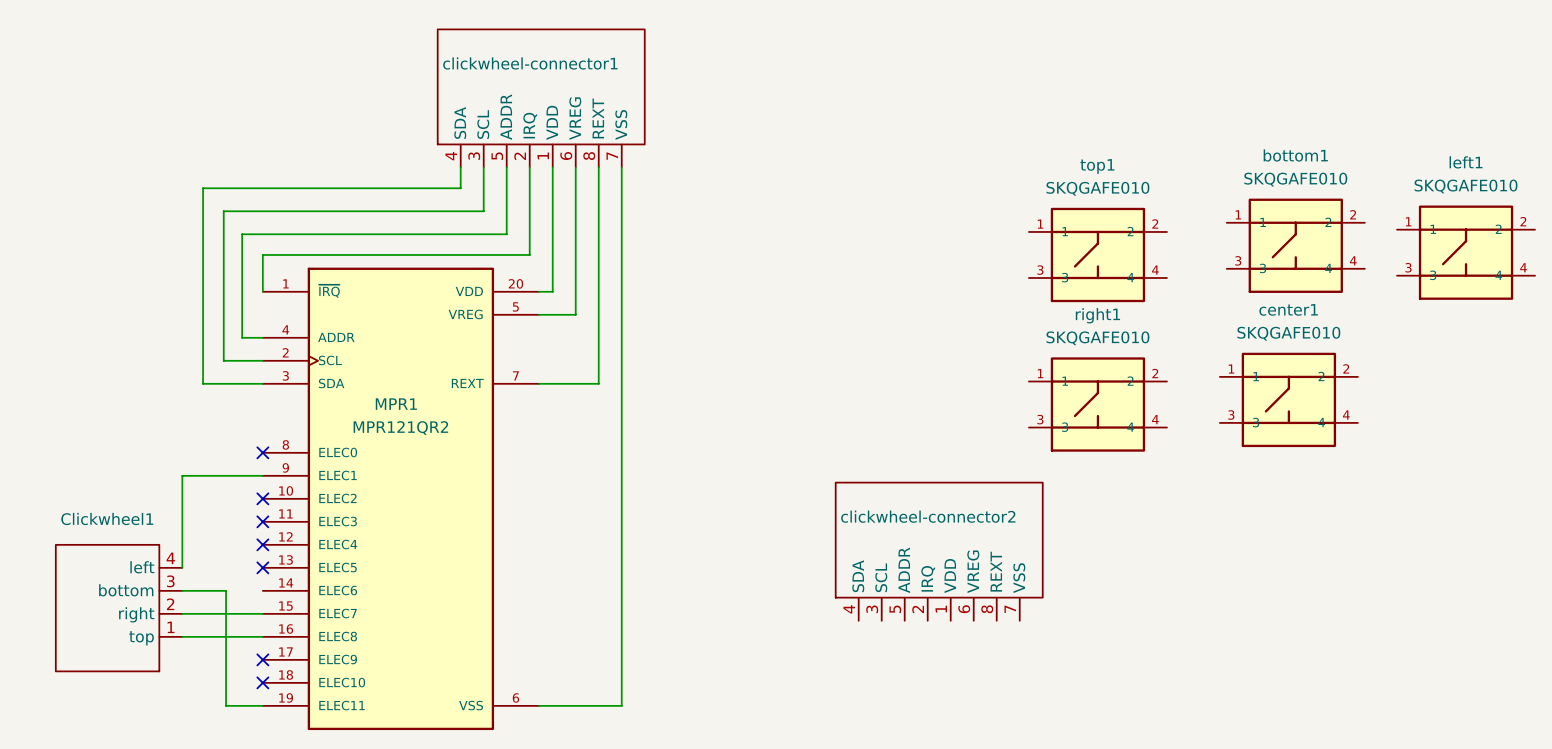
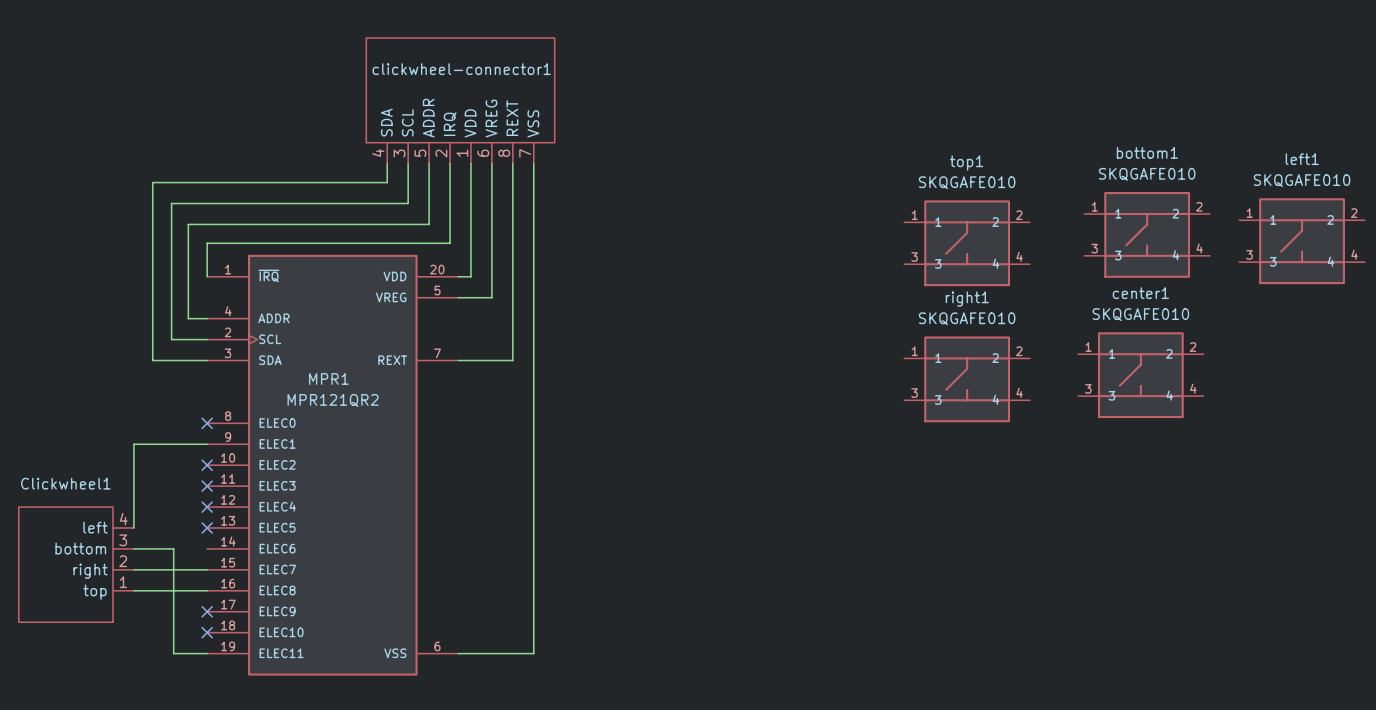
clickwheel-connector2: (939, 551) -> none

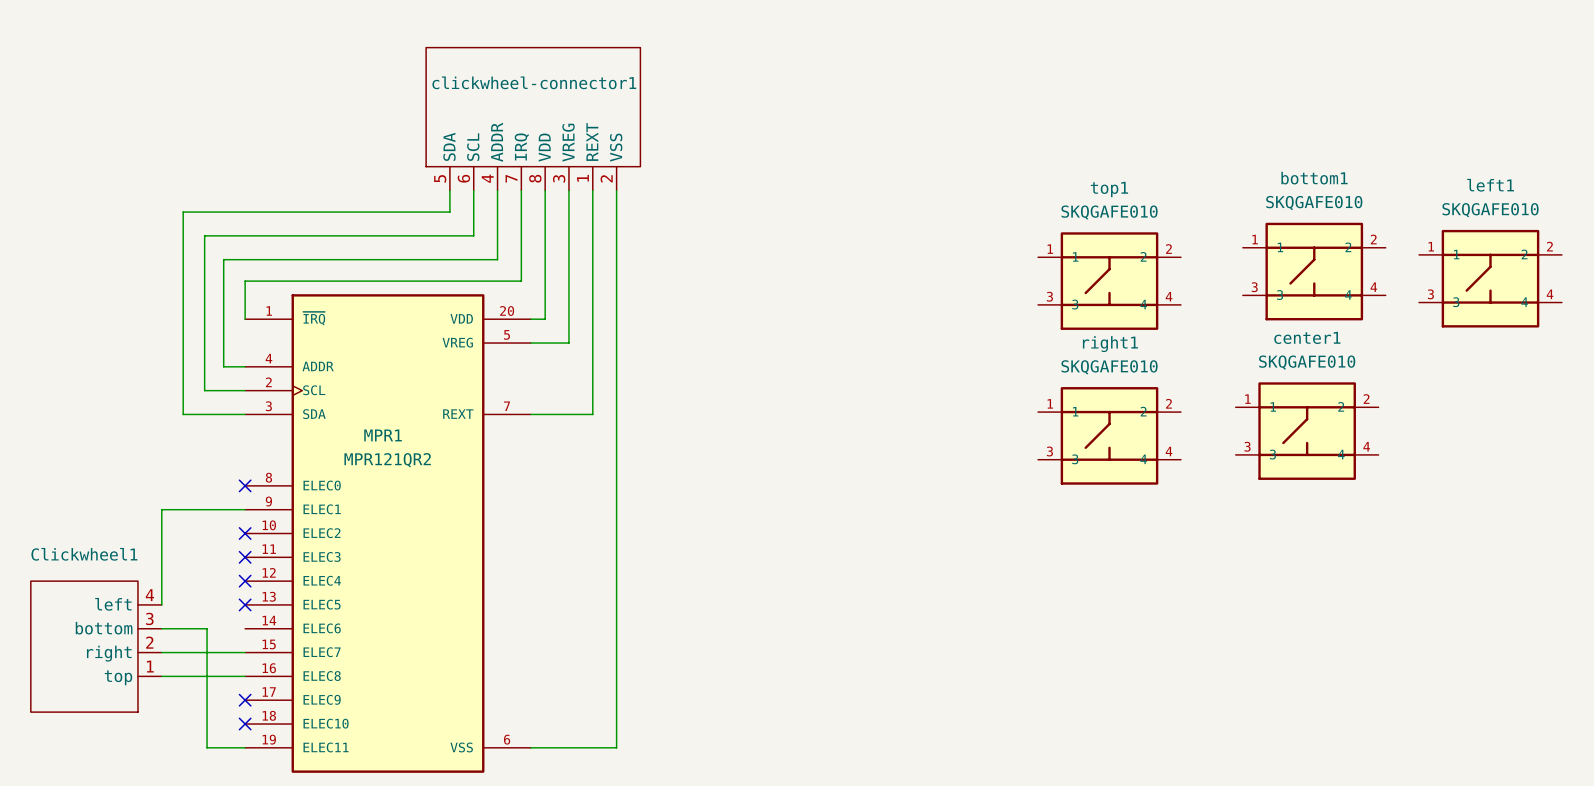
clickwheel-connector1 pin number: 4 (378, 153) -> 5 (440, 178)
clickwheel-connector1 pin number: 3 (399, 153) -> 6 (463, 178)
clickwheel-connector1 pin number: 5 (420, 153) -> 4 (487, 178)
clickwheel-connector1 pin number: 2 (441, 153) -> 7 (511, 178)
clickwheel-connector1 pin number: 1 (462, 153) -> 8 (535, 178)
clickwheel-connector1 pin number: 6 (483, 153) -> 3 (559, 178)
clickwheel-connector1 pin number: 8 (504, 153) -> 1 (582, 178)
clickwheel-connector1 pin number: 7 (525, 153) -> 2 (606, 178)

